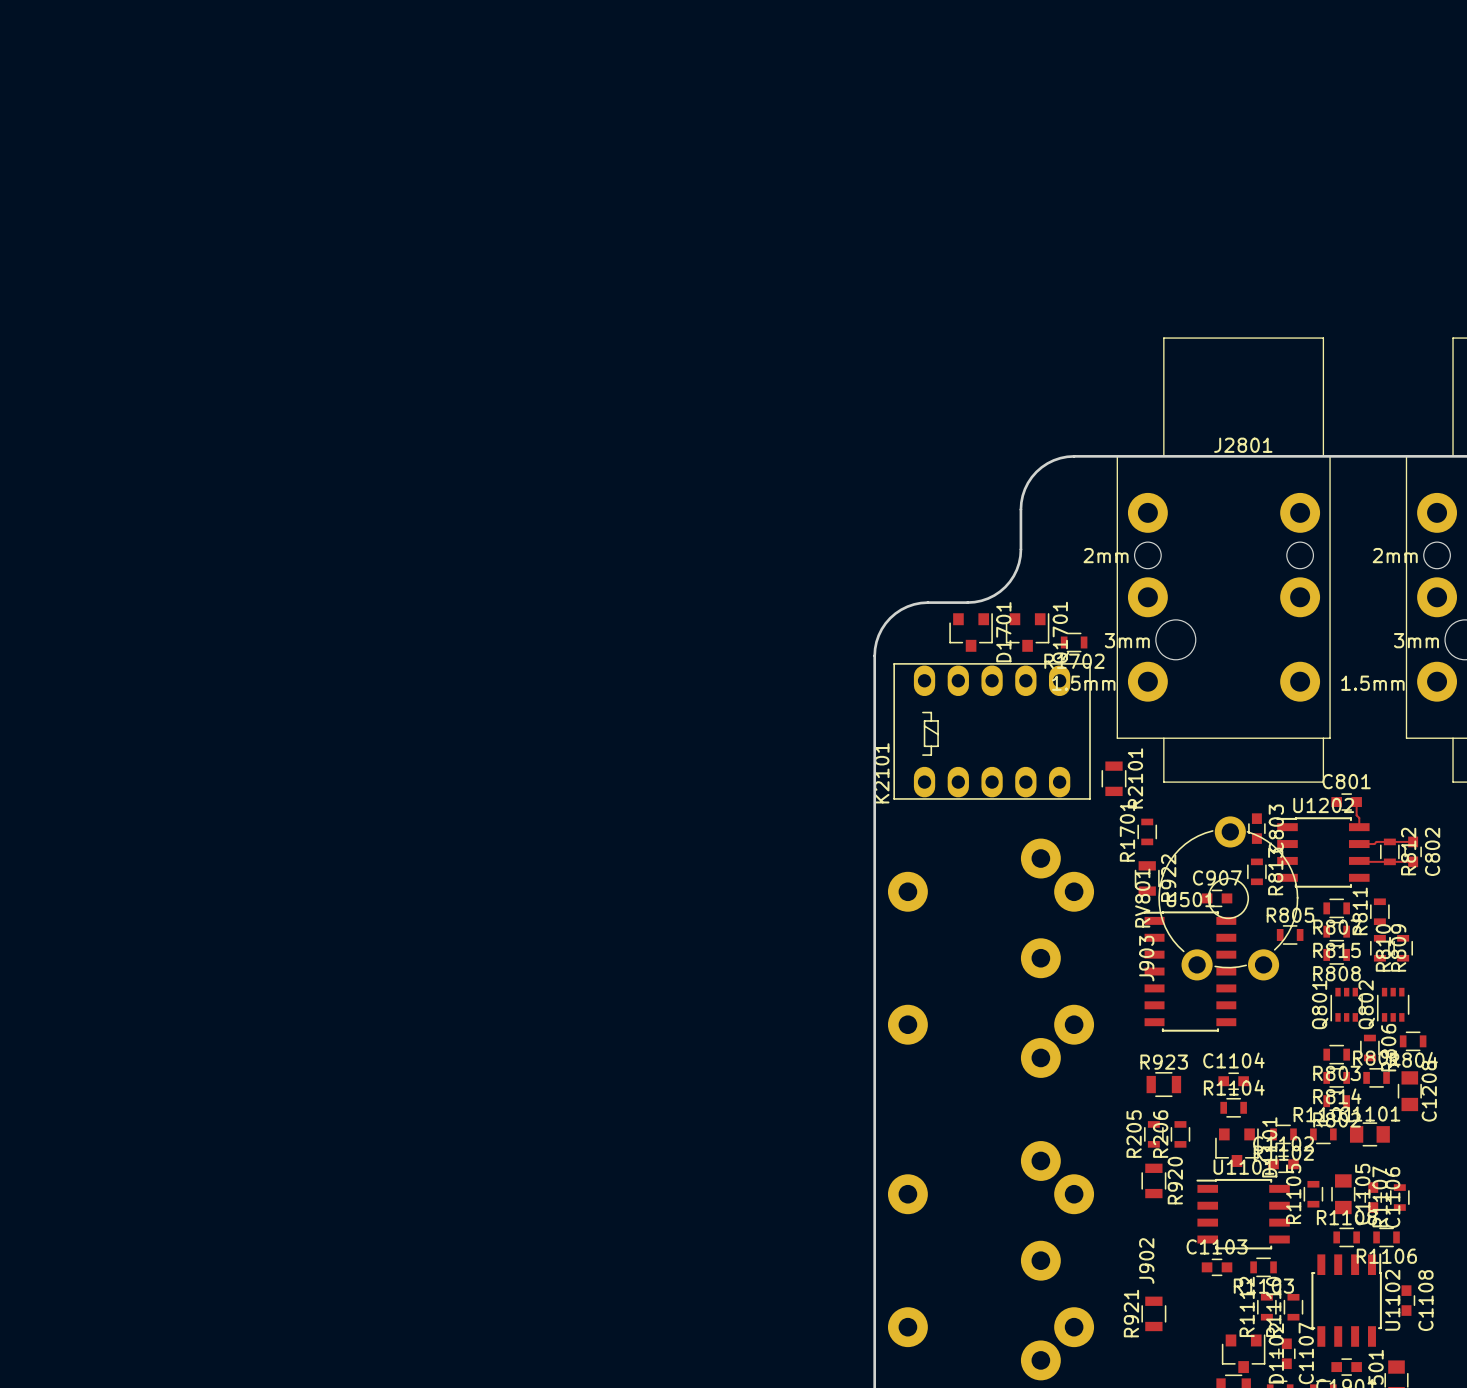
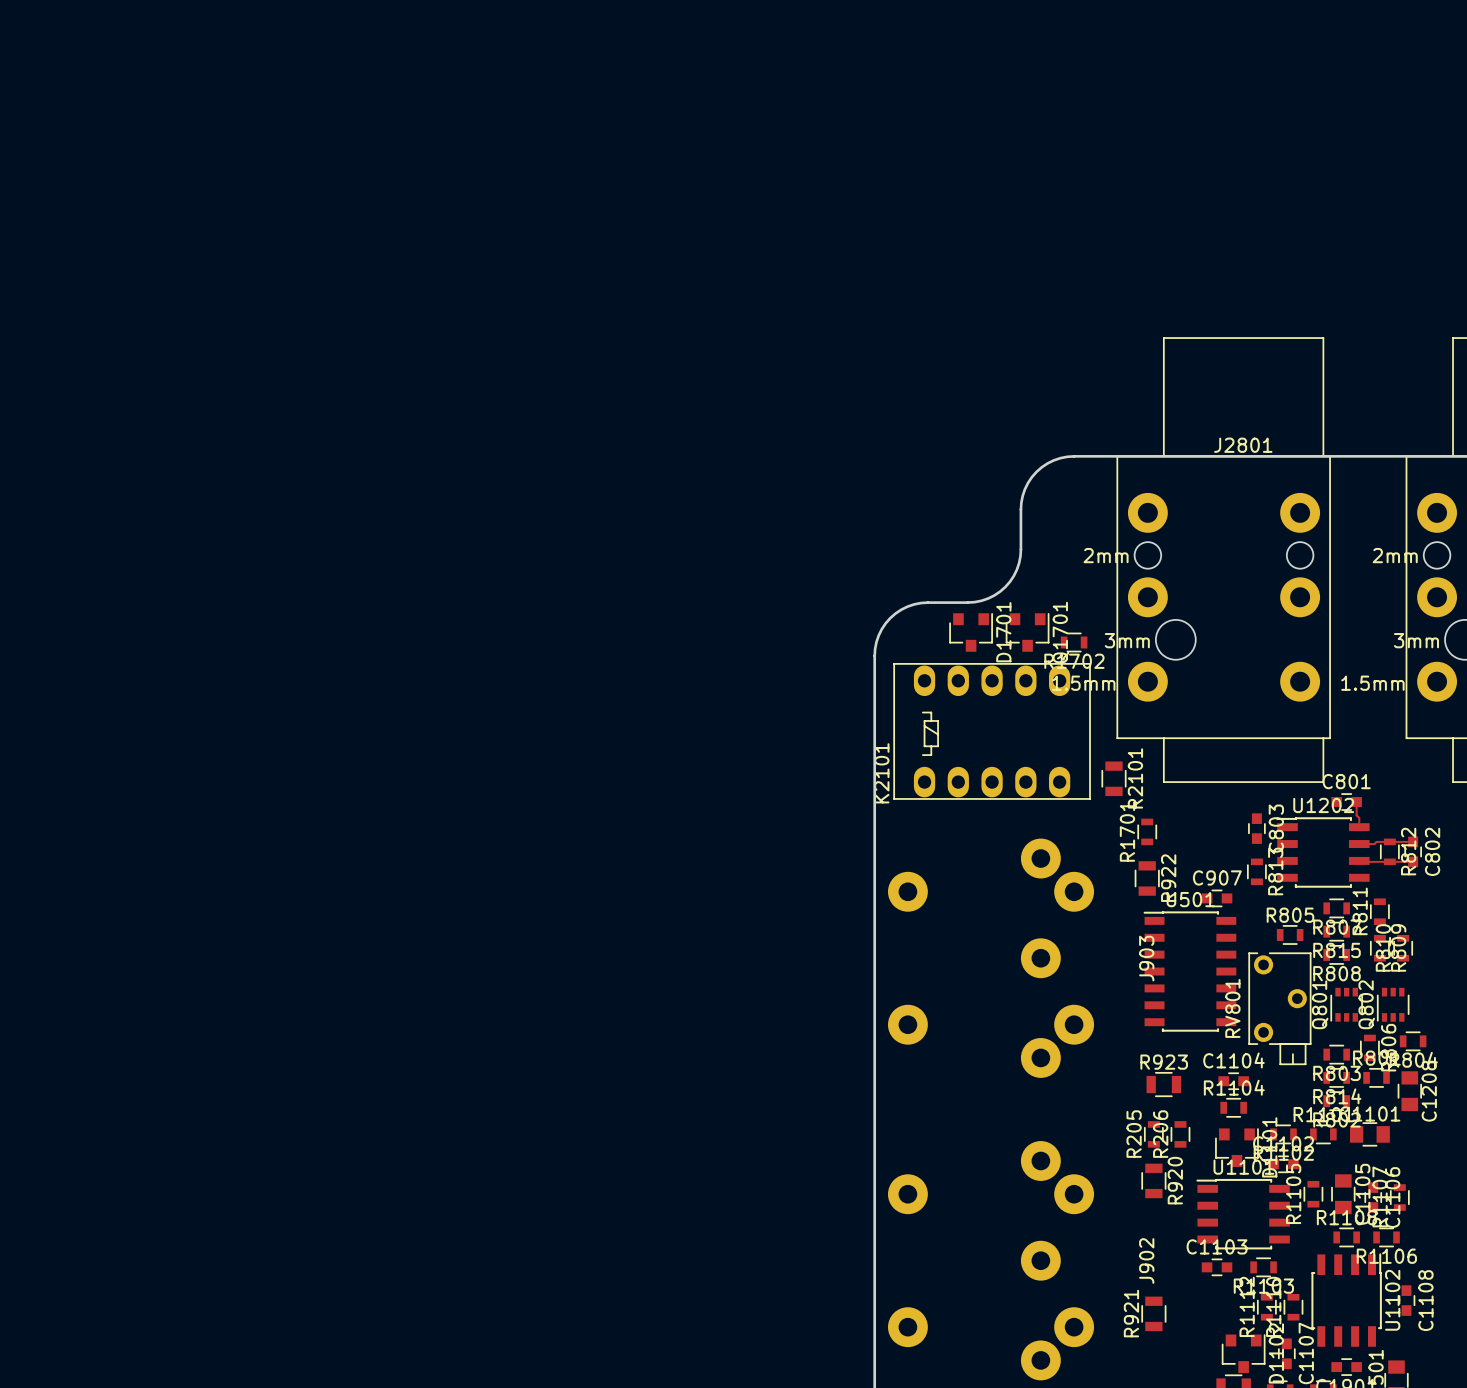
RV801 footprint: [1158, 816, 1299, 981] -> [1248, 952, 1312, 1066]
RV801 name position: RV801 (1142, 898) -> RV801 (1232, 1008)

